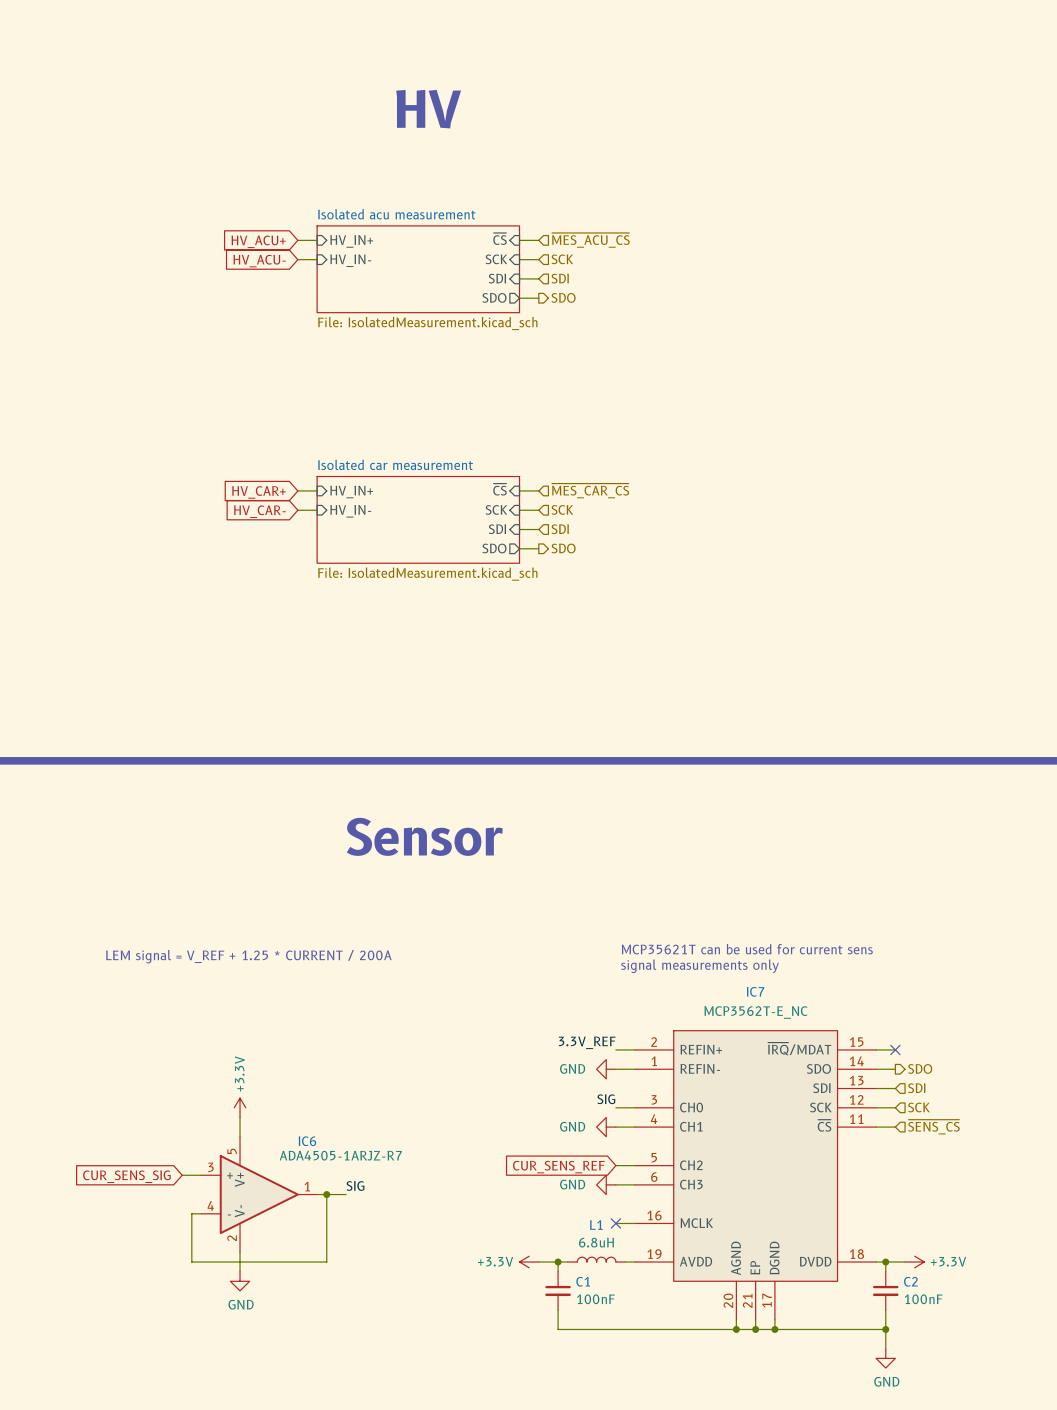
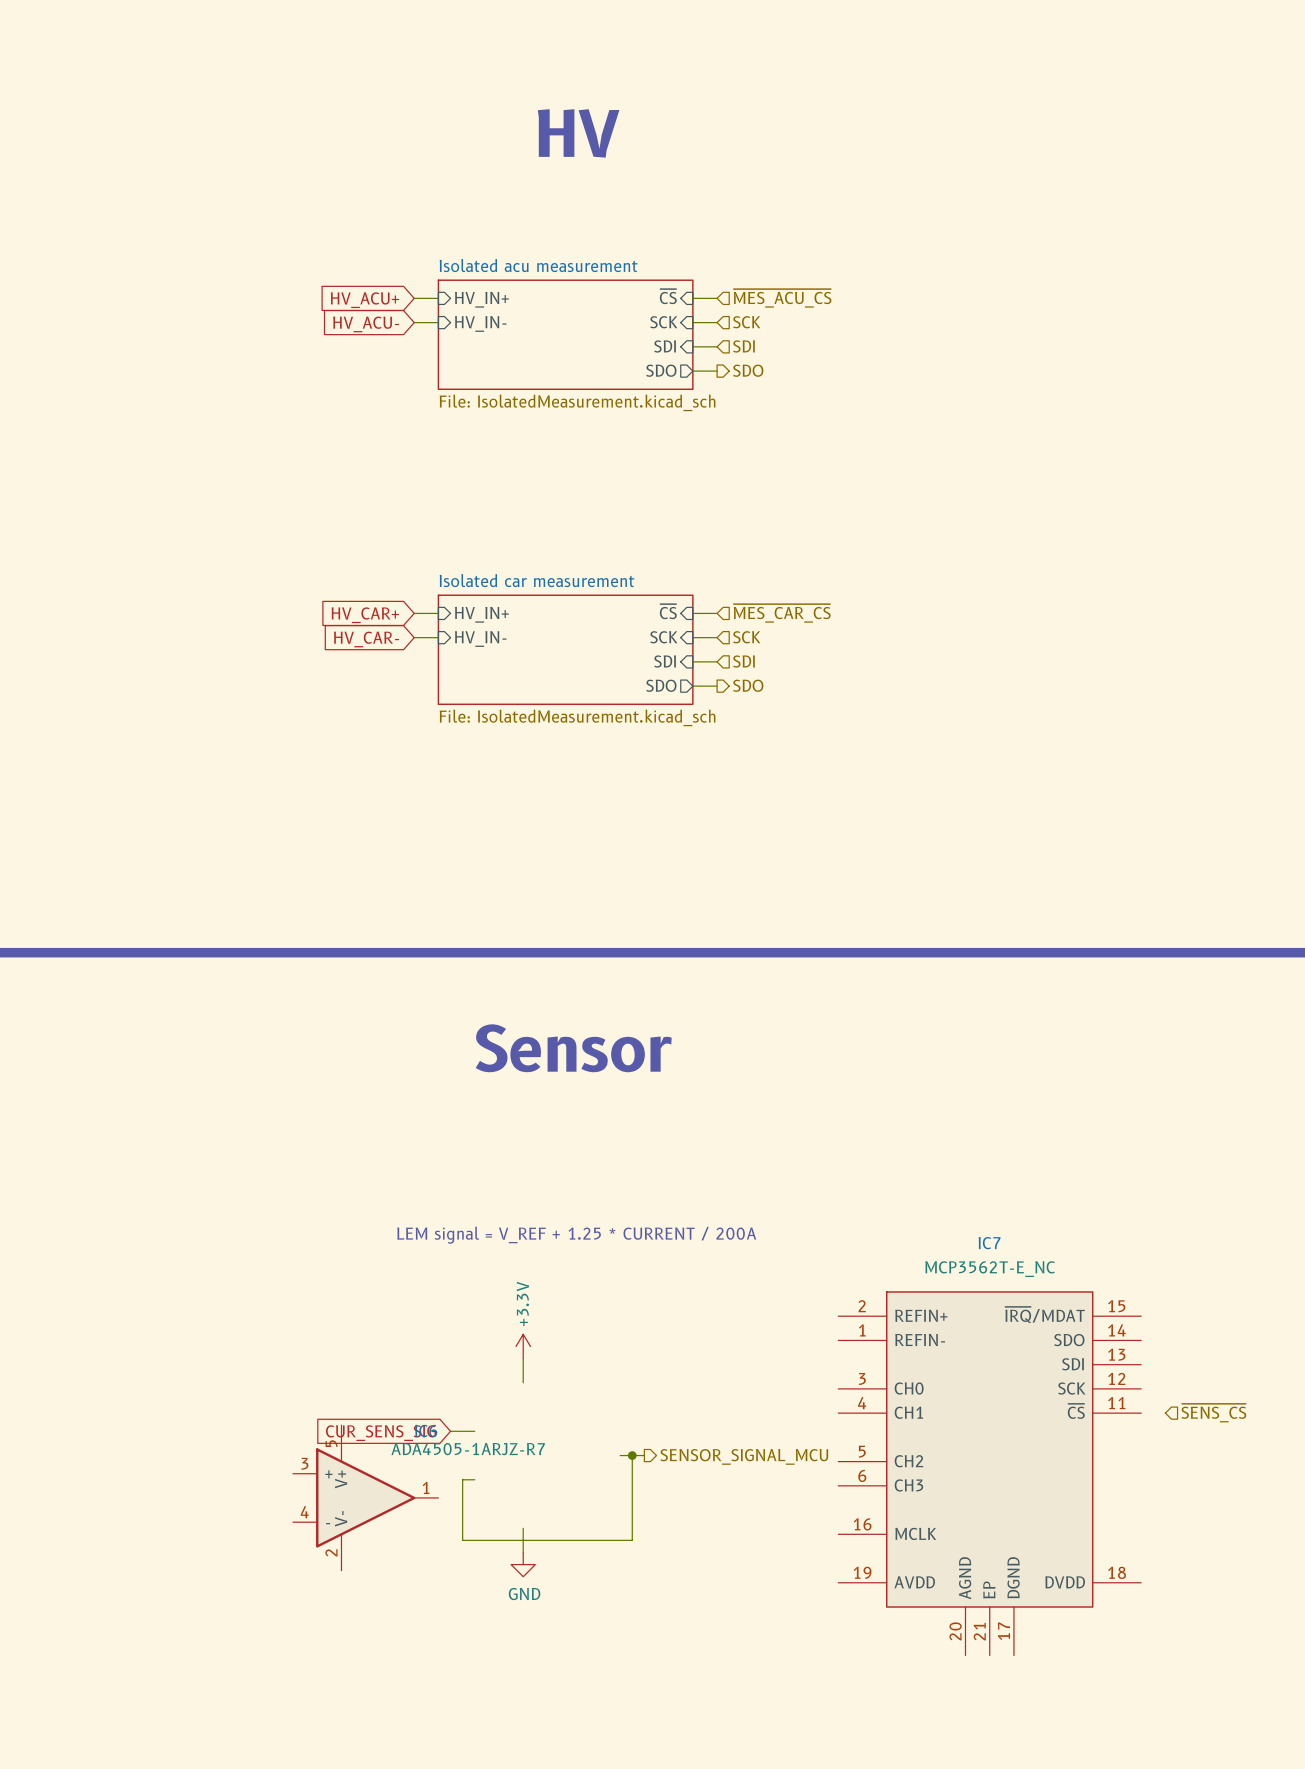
text: MCP35621T can be used for current sens (747, 949) -> none
text position: LEM signal = V_REF + 1.25 * CURRENT / 200A (248, 956) -> LEM signal = V_REF + 1.25 * CURRENT / 200A (576, 1235)
text: signal measurements only (700, 966) -> none
label: 3.3V_REF (587, 1042) -> none
wire: (615, 1049) (635, 1049) -> none
wire: (876, 1049) (895, 1049) -> none
no-connect mark: (895, 1049) -> none
hierarchical label: SDO (920, 1068) -> none
power symbol: GND (606, 1069) -> none
wire: (615, 1069) (635, 1069) -> none
wire: (876, 1069) (895, 1069) -> none
power symbol: none -> +3.3V (523, 1346)
wire: (876, 1088) (895, 1088) -> none
hierarchical label: SDI (916, 1088) -> none
label: SIG (606, 1099) -> none
power symbol: +3.3V (240, 1107) -> none
wire: (615, 1107) (635, 1107) -> none
wire: (876, 1107) (895, 1107) -> none
hierarchical label: SCK (918, 1107) -> none
wire: (240, 1117) (240, 1136) -> (523, 1358) (523, 1382)
power symbol: GND (606, 1127) -> none
wire: (615, 1127) (635, 1127) -> none
wire: (876, 1127) (895, 1127) -> none
junction: none -> (632, 1455)
hierarchical label: none -> SENSOR_SIGNAL_MCU (744, 1456)
wire: (615, 1165) (635, 1165) -> (620, 1455) (644, 1455)
global label: CUR_SENS_REF (558, 1167) -> none
wire: (182, 1175) (201, 1175) -> (450, 1431) (474, 1431)
global label position: CUR_SENS_SIG (126, 1176) -> CUR_SENS_SIG (381, 1433)
power symbol: GND (606, 1184) -> none
wire: (615, 1184) (635, 1184) -> none
label: SIG (355, 1186) -> none
wire: (317, 1194) (346, 1194) -> none
wire: (326, 1194) (326, 1262) (191, 1262) (191, 1213) (201, 1213) -> (632, 1455) (632, 1540) (462, 1540) (462, 1479) (474, 1479)
junction: (326, 1194) -> none
wire: (615, 1223) (635, 1223) -> none
no-connect mark: (615, 1223) -> none
power symbol: none -> GND (523, 1564)
wire: (240, 1252) (240, 1271) -> (523, 1528) (523, 1552)
L1: 6.8uH (596, 1259) -> none
power symbol: +3.3V (529, 1262) -> none
wire: (538, 1262) (567, 1262) -> none
wire: (558, 1262) (558, 1271) -> none
junction: (558, 1262) -> none
wire: (625, 1262) (635, 1262) -> none
wire: (876, 1262) (905, 1262) -> none
wire: (885, 1262) (885, 1271) -> none
junction: (885, 1262) -> none
power symbol: +3.3V (914, 1262) -> none
power symbol: GND (240, 1281) -> none
C1: 100nF (558, 1290) -> none
C2: 100nF (885, 1290) -> none
wire: (558, 1310) (558, 1329) (885, 1329) -> none
wire: (885, 1310) (885, 1348) -> none
wire: (736, 1319) (736, 1329) -> none
wire: (755, 1319) (755, 1329) -> none
wire: (774, 1319) (774, 1329) -> none
junction: (736, 1329) -> none
junction: (755, 1329) -> none
junction: (774, 1329) -> none
junction: (885, 1329) -> none
power symbol: GND (885, 1358) -> none

